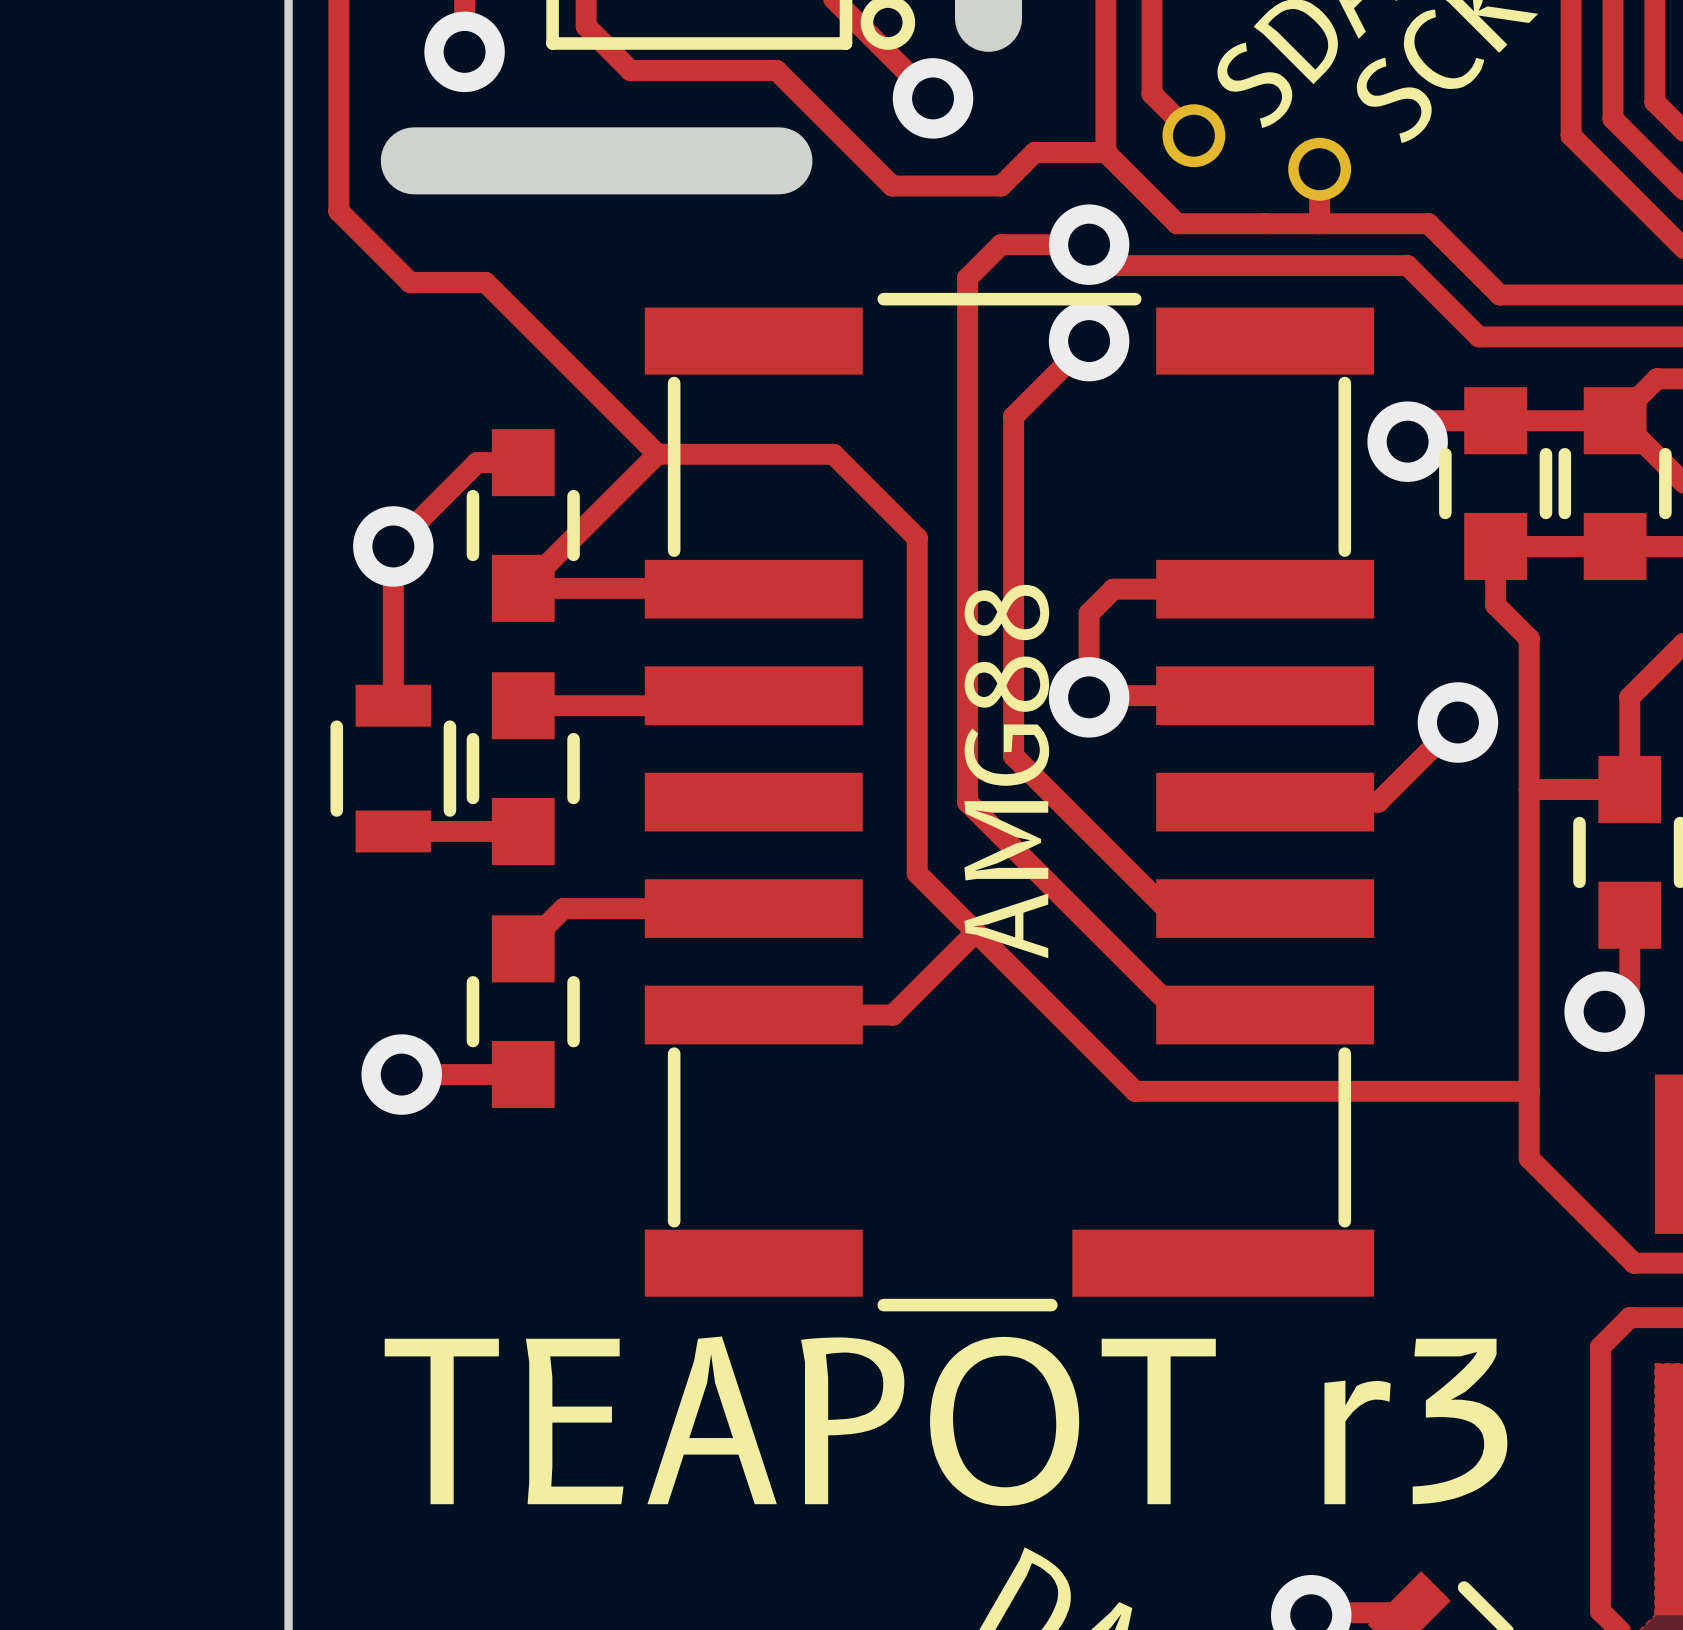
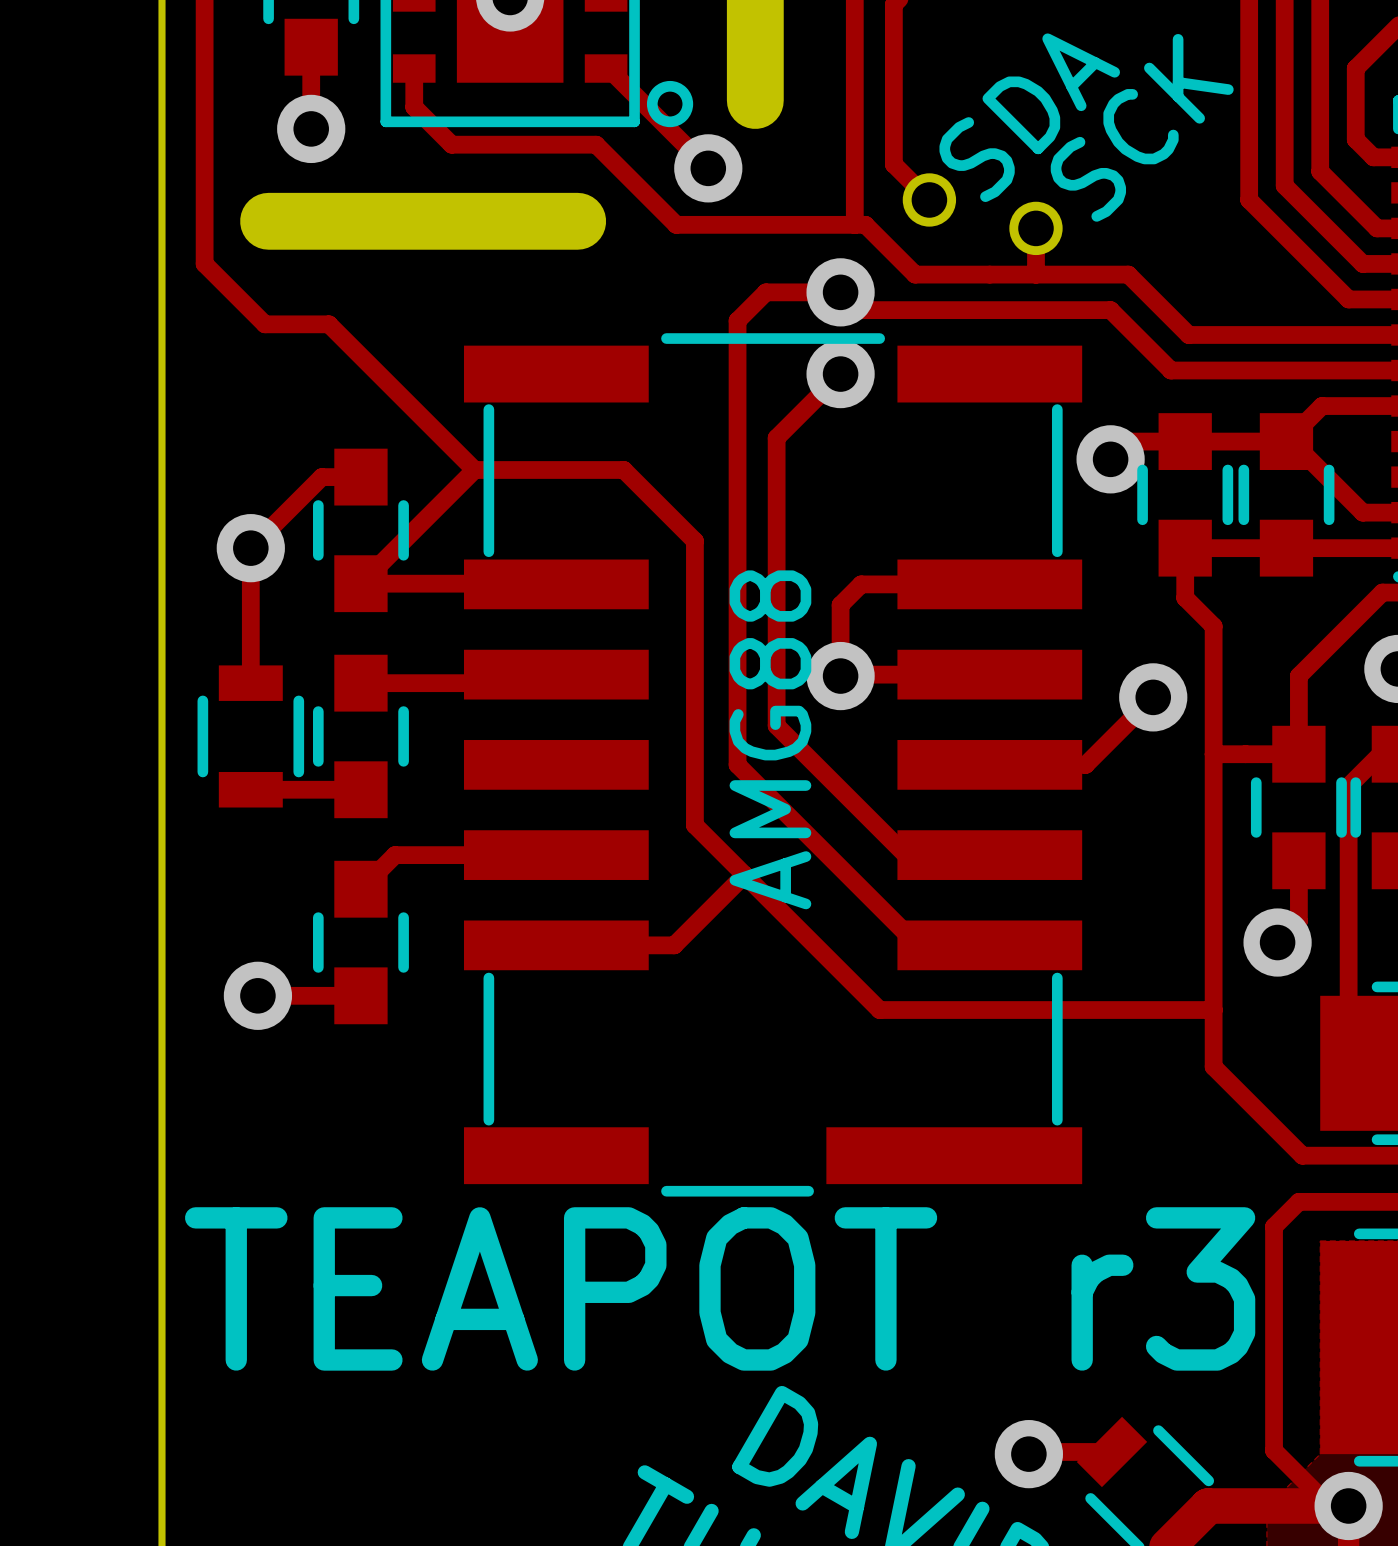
track: (776, 70) (892, 185) (1001, 185) (1034, 152) (1105, 152) (1118, 165) -> (575, 144) (596, 144) (676, 224) (865, 224)

